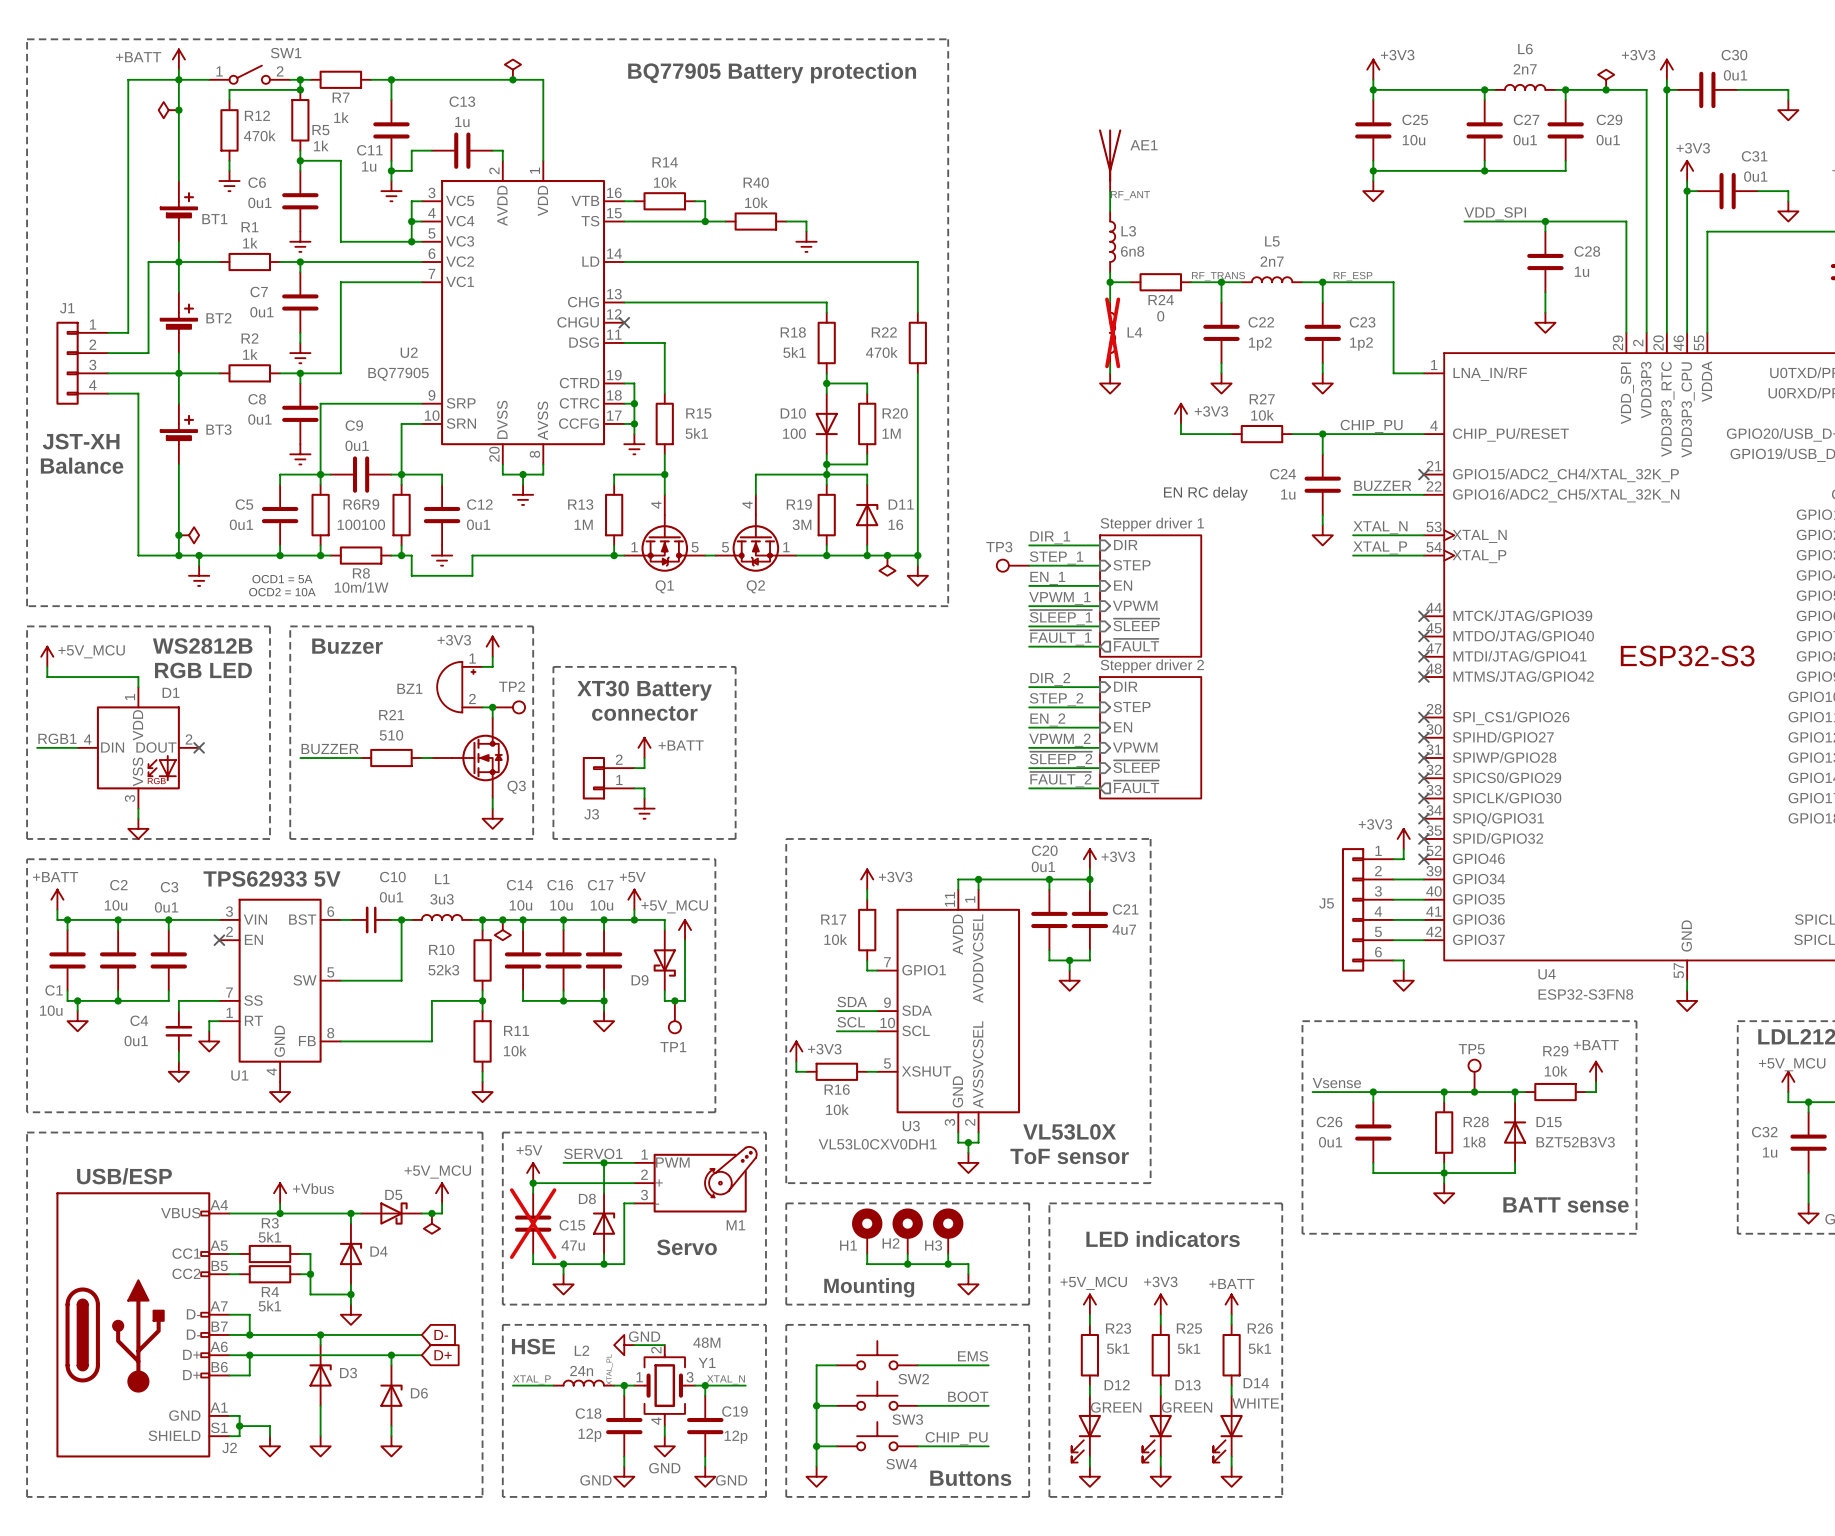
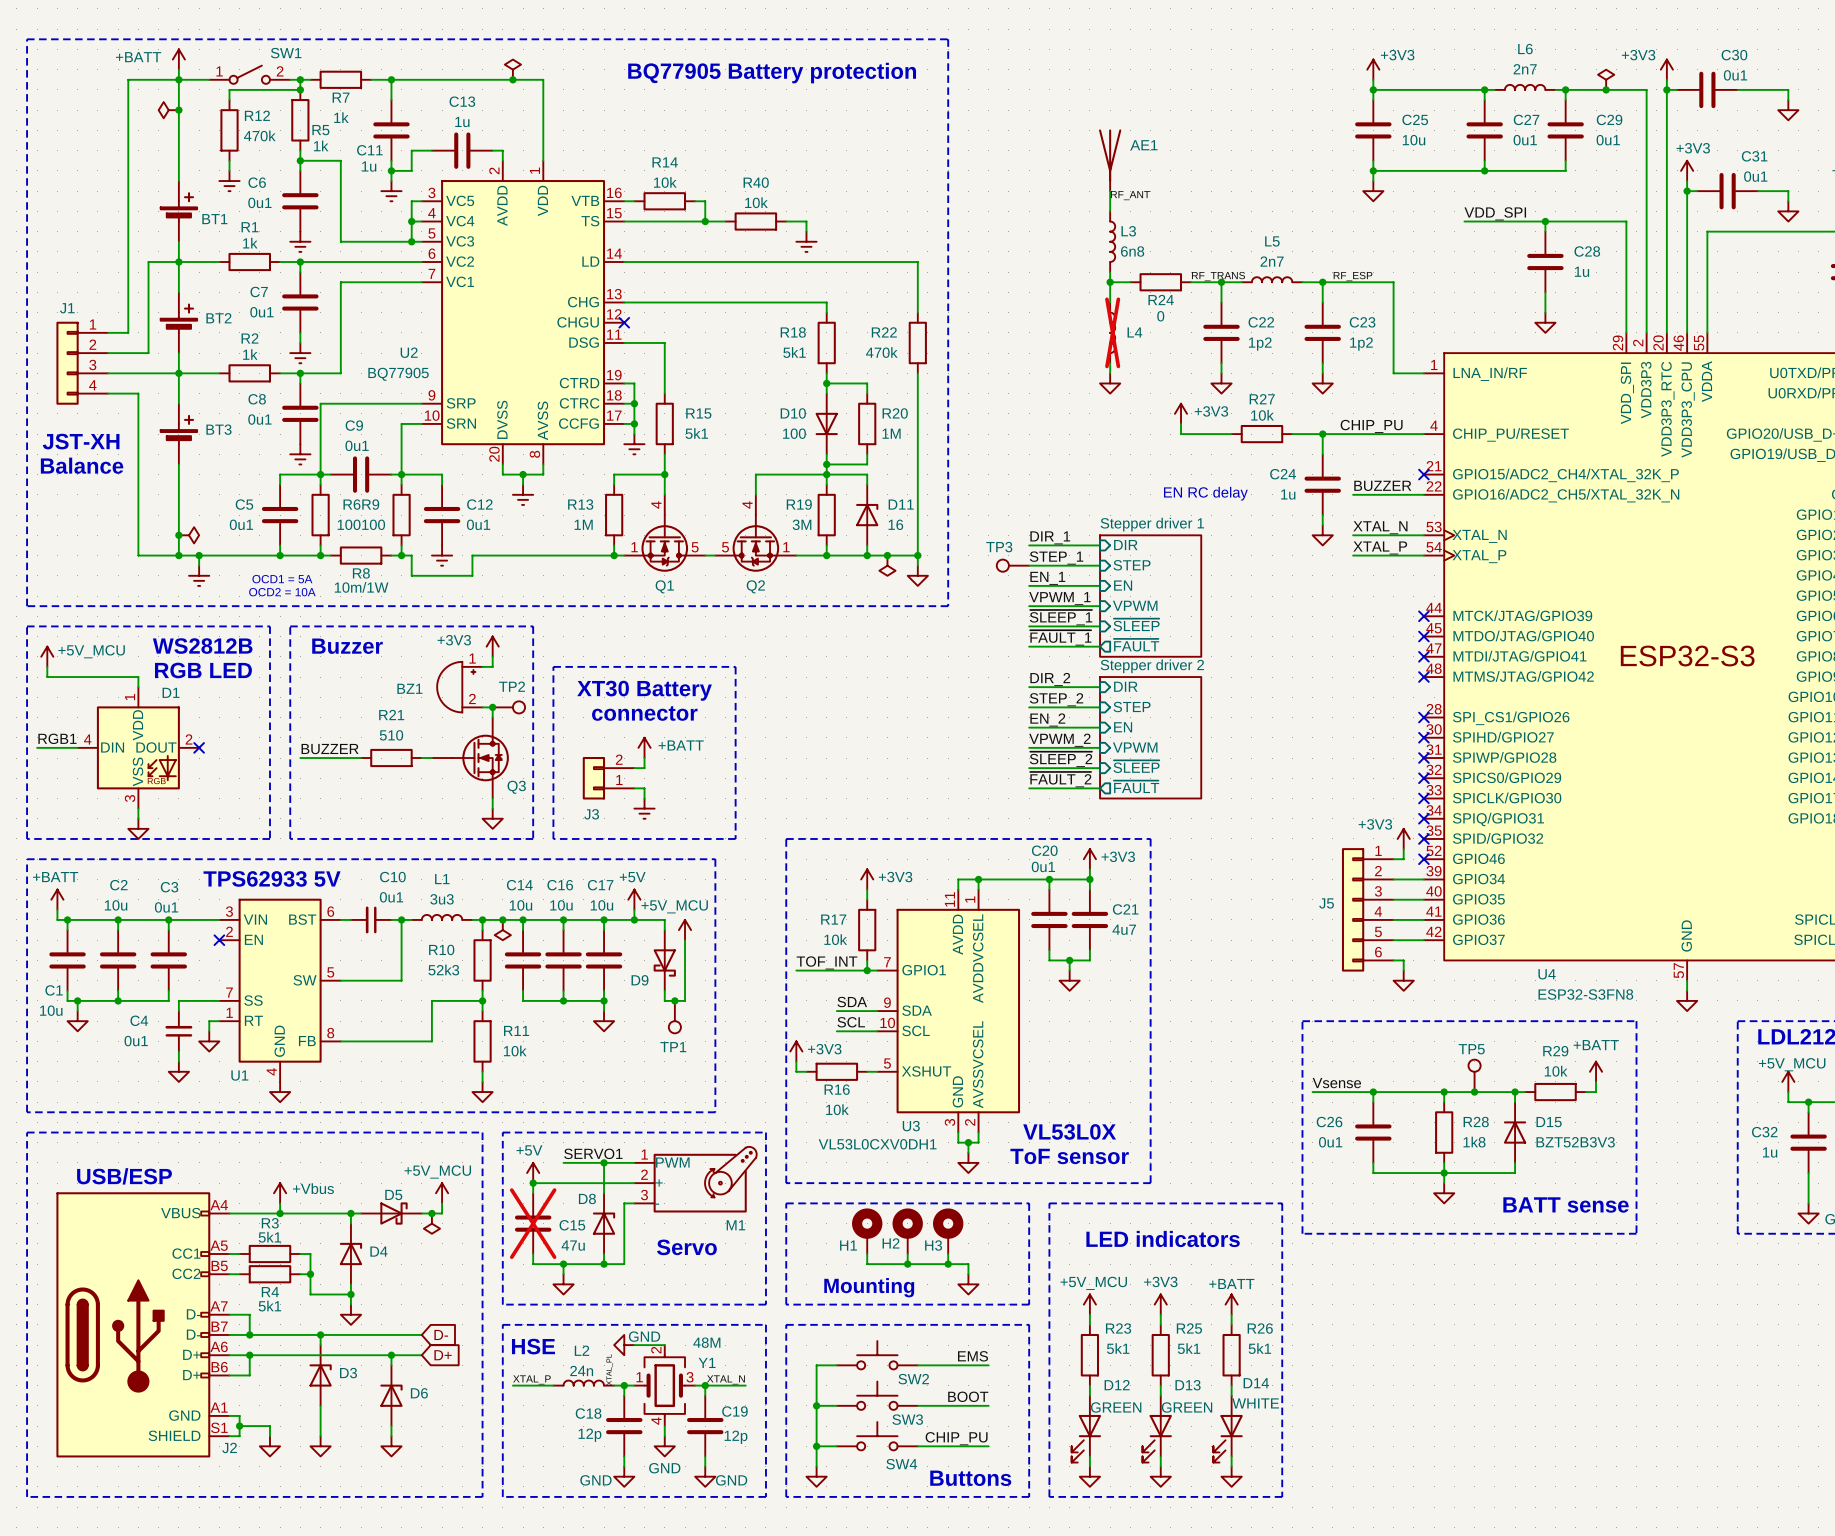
label: none -> TOF_INT (827, 962)
wire: none -> (796, 970) (867, 970)
junction: none -> (867, 970)

